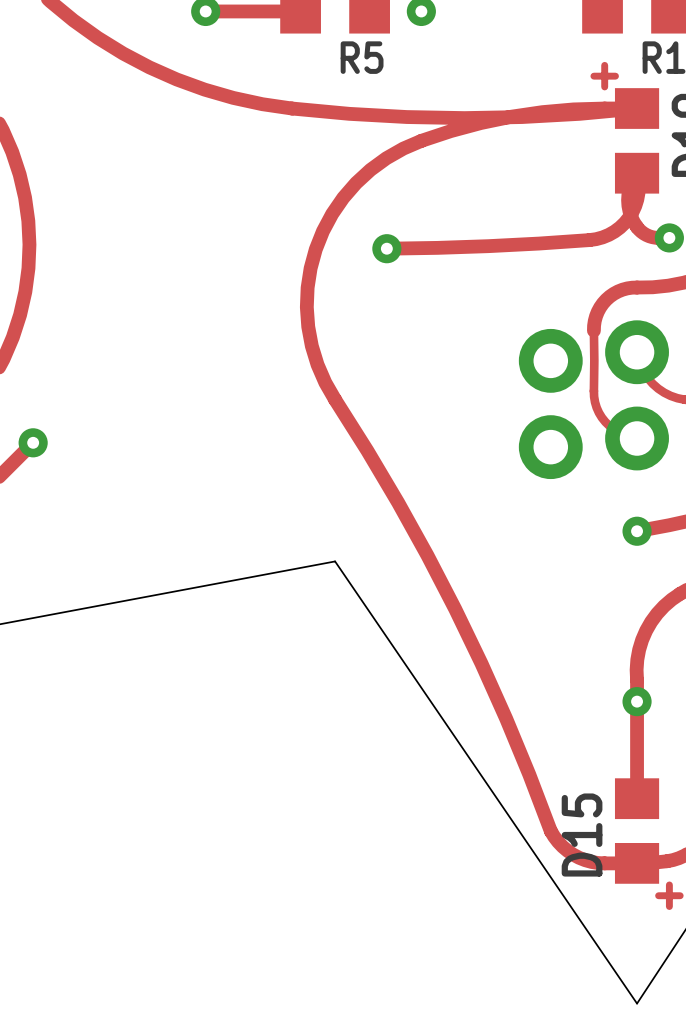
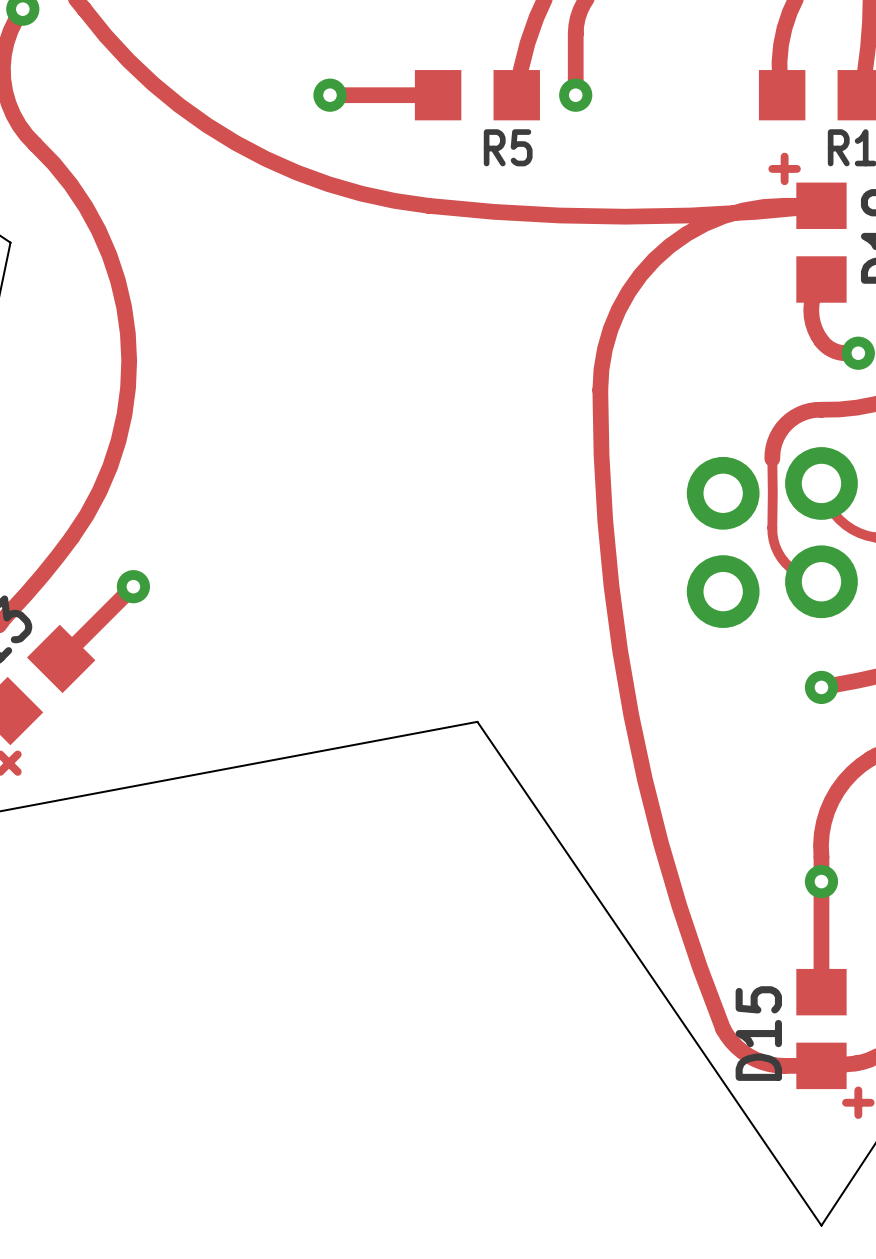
track: (604, 108) (542, 112) (481, 122) (421, 140) (386, 158) (356, 183) (332, 213) (315, 249) (307, 287) (308, 326) (311, 346) (325, 382) (398, 502) (455, 609) (506, 718) (550, 831) -> (600, 390) (605, 520) (611, 586) (631, 715) (644, 779) (679, 905) (723, 1029)
track: none -> (784, 205) (743, 210) (704, 224) (686, 234) (654, 259) (640, 275) (618, 310) (604, 349) (600, 390)
track: (637, 173) (638, 193) (632, 212) (619, 227) (602, 237) (538, 243) (386, 248) -> none
via: (386, 248) -> none

